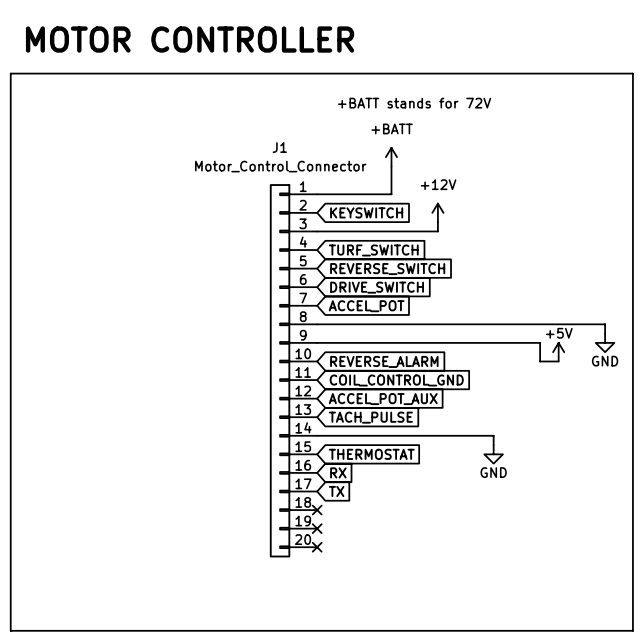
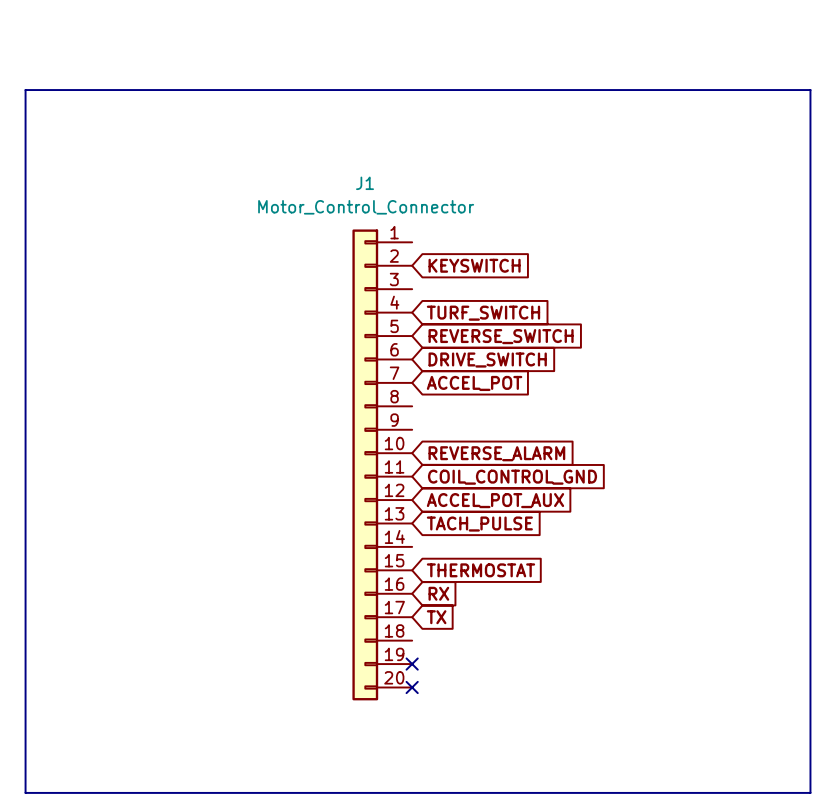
text: MOTOR CONTROLLER (190, 39) -> none
text: +BATT stands for 72V (414, 103) -> none
power symbol: +BATT (391, 157) -> none
wire: (391, 166) (391, 194) (317, 194) -> none
power symbol: +12V (437, 212) -> none
wire: (437, 222) (437, 231) (317, 231) -> none
wire: (317, 324) (605, 324) (605, 333) -> none
wire: (317, 342) (540, 342) (540, 361) (558, 361) -> none
power symbol: GND (605, 342) -> none
power symbol: +5V (558, 352) -> none
wire: (317, 435) (493, 435) (493, 445) -> none
power symbol: GND (493, 454) -> none
no-connect mark: (317, 510) -> none

